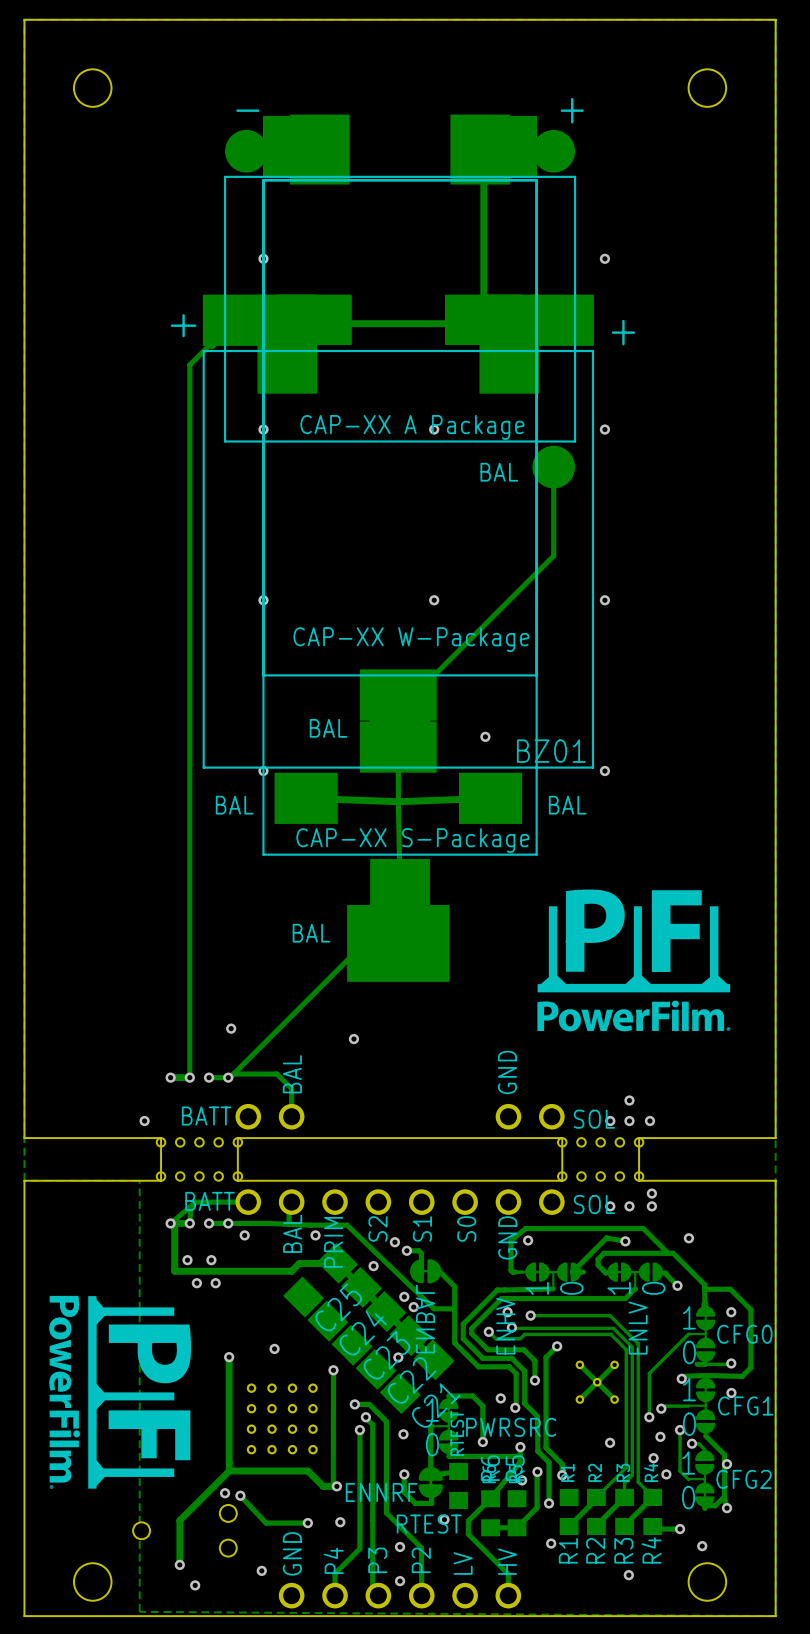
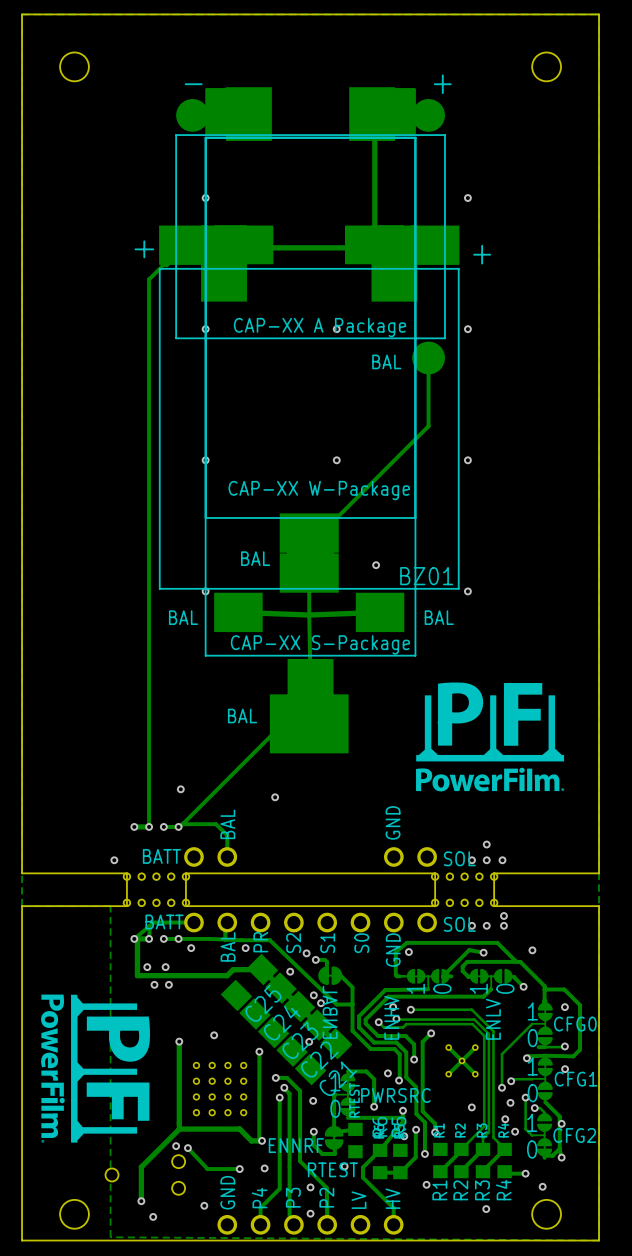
text: PRIM (333, 1242) -> PR (260, 942)

